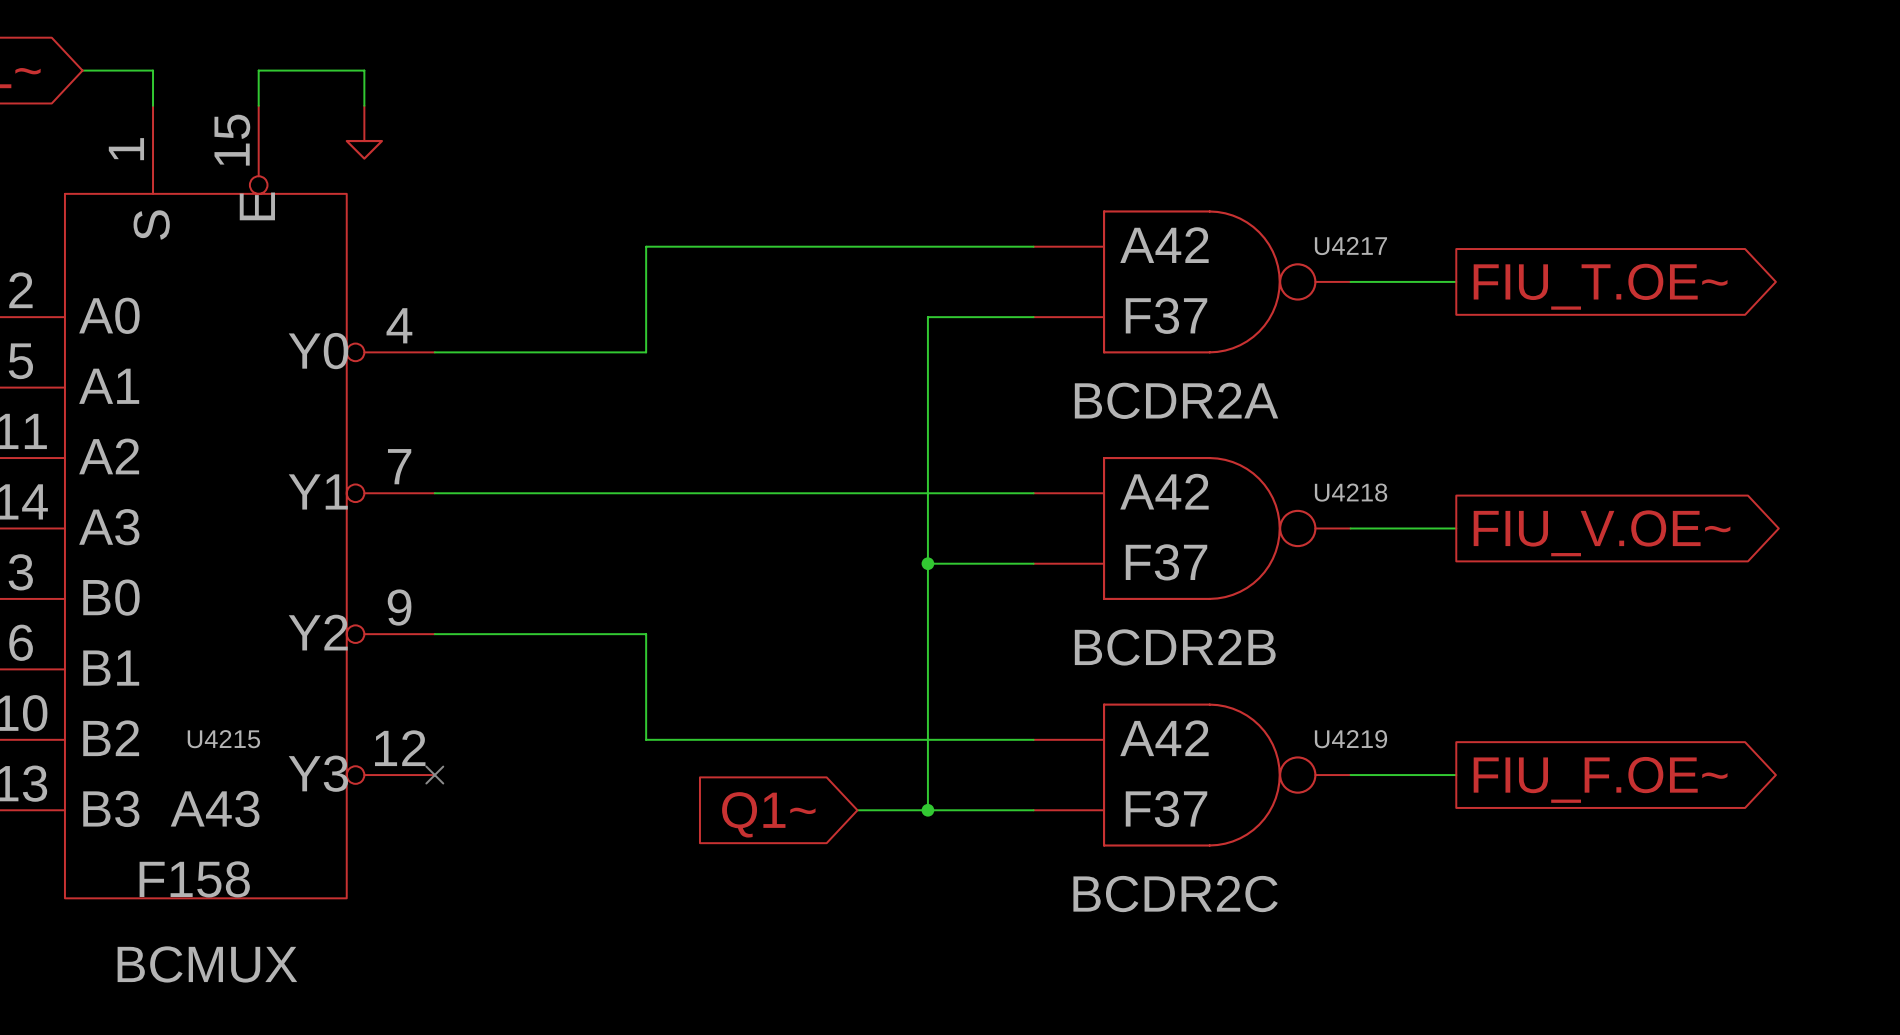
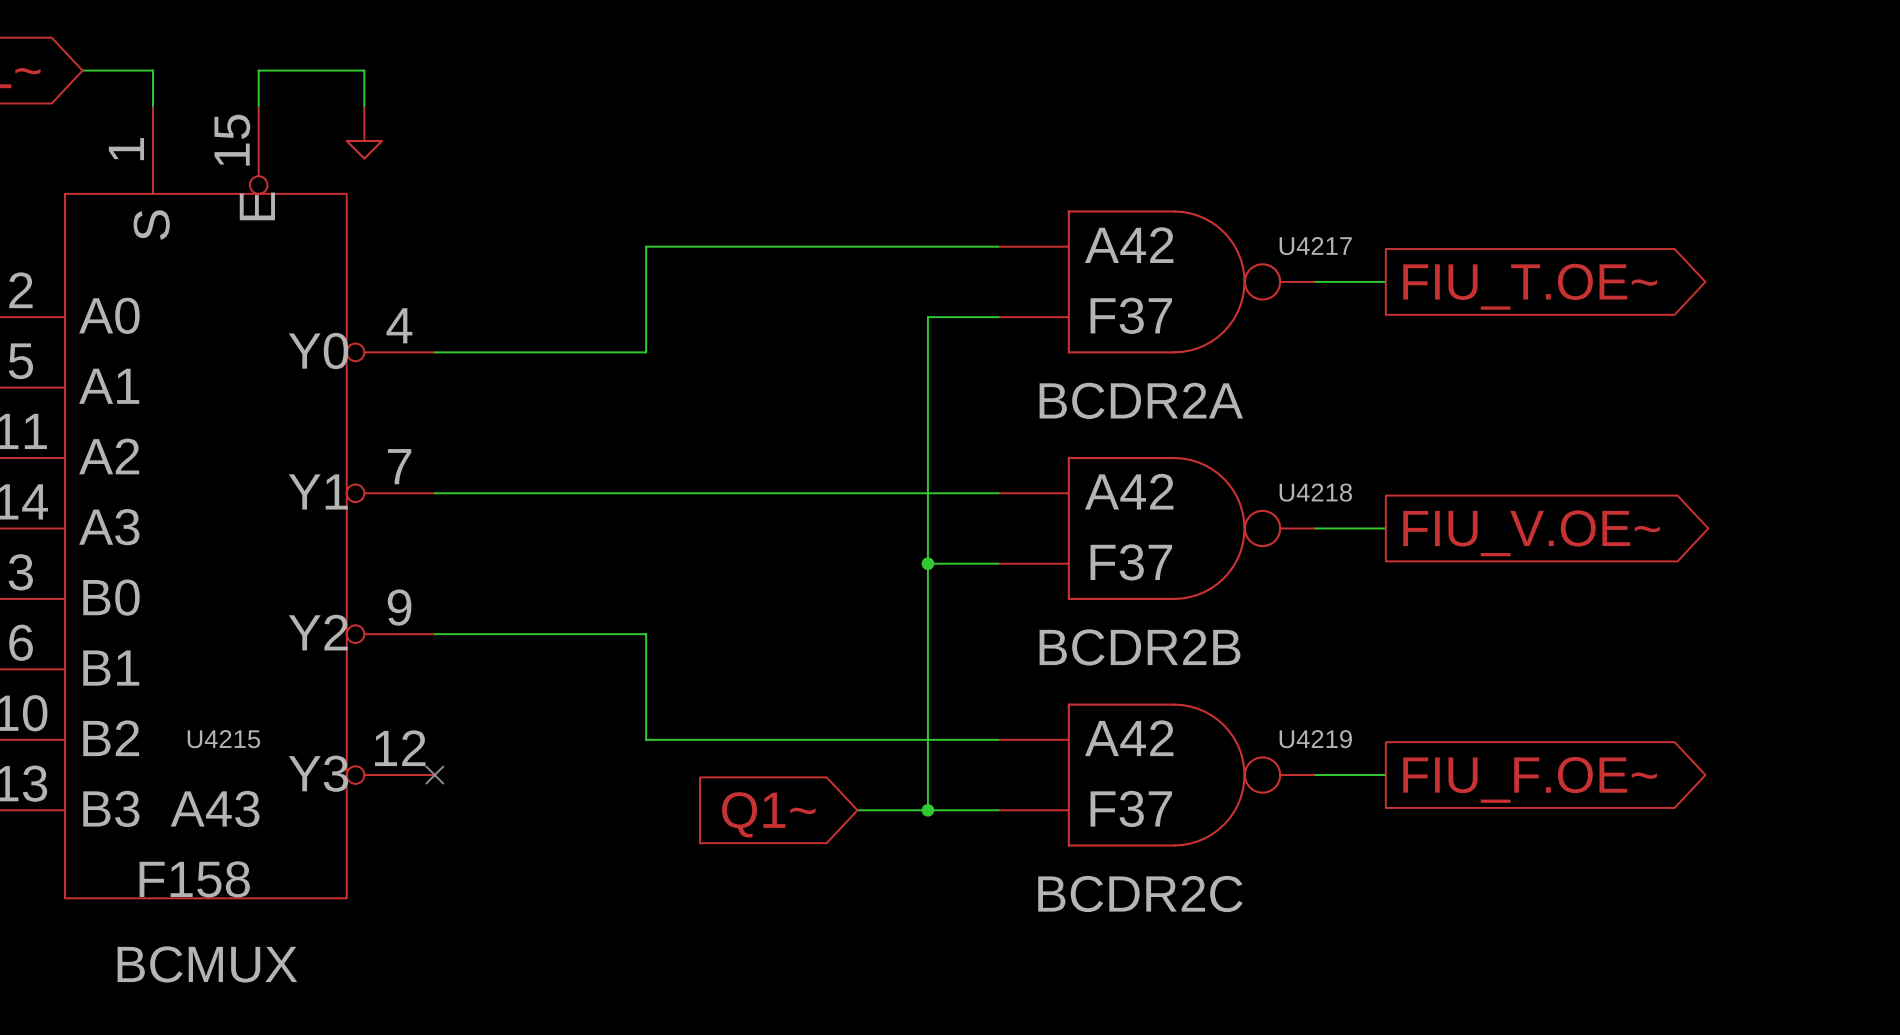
U4217 position: (1192, 281) -> (1156, 281)
wire: (1385, 281) (1456, 281) -> none
global label position: FIU_T.OE~ (1600, 286) -> FIU_T.OE~ (1530, 286)
U4218 position: (1192, 528) -> (1156, 528)
wire: (1385, 528) (1456, 528) -> none
global label position: FIU_V.OE~ (1602, 533) -> FIU_V.OE~ (1531, 533)
U4219 position: (1192, 775) -> (1156, 775)
wire: (1385, 775) (1456, 775) -> none
global label position: FIU_F.OE~ (1600, 779) -> FIU_F.OE~ (1530, 779)

